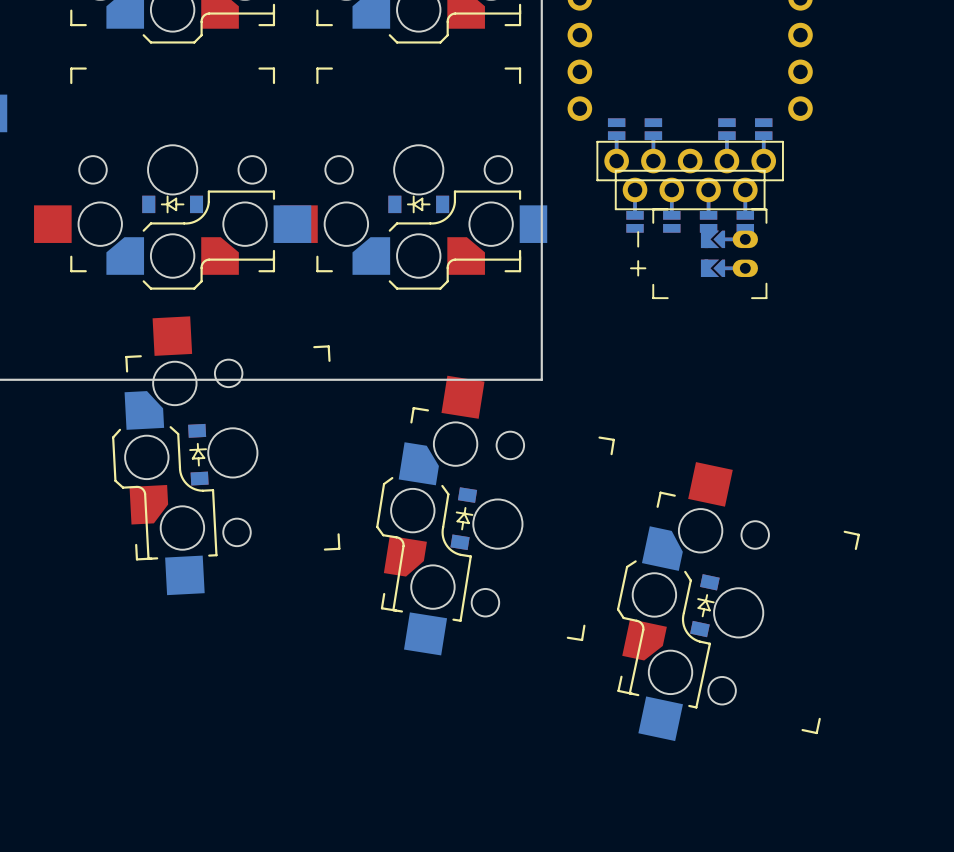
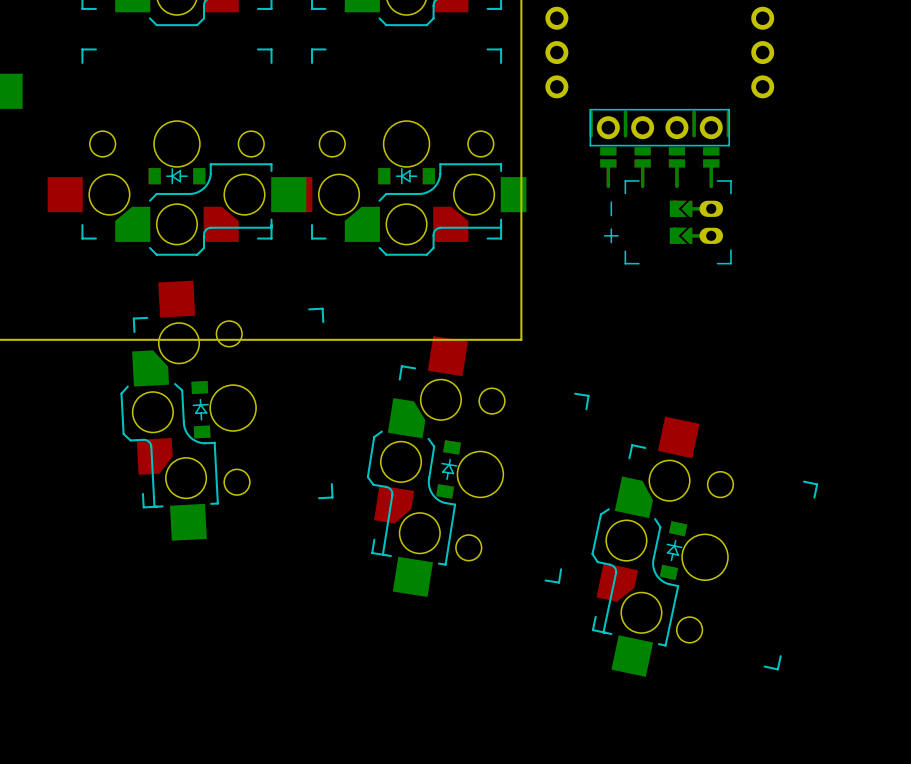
part footprint: [596, 118, 784, 182] -> [589, 108, 731, 168]
part: (690, 201) -> none

